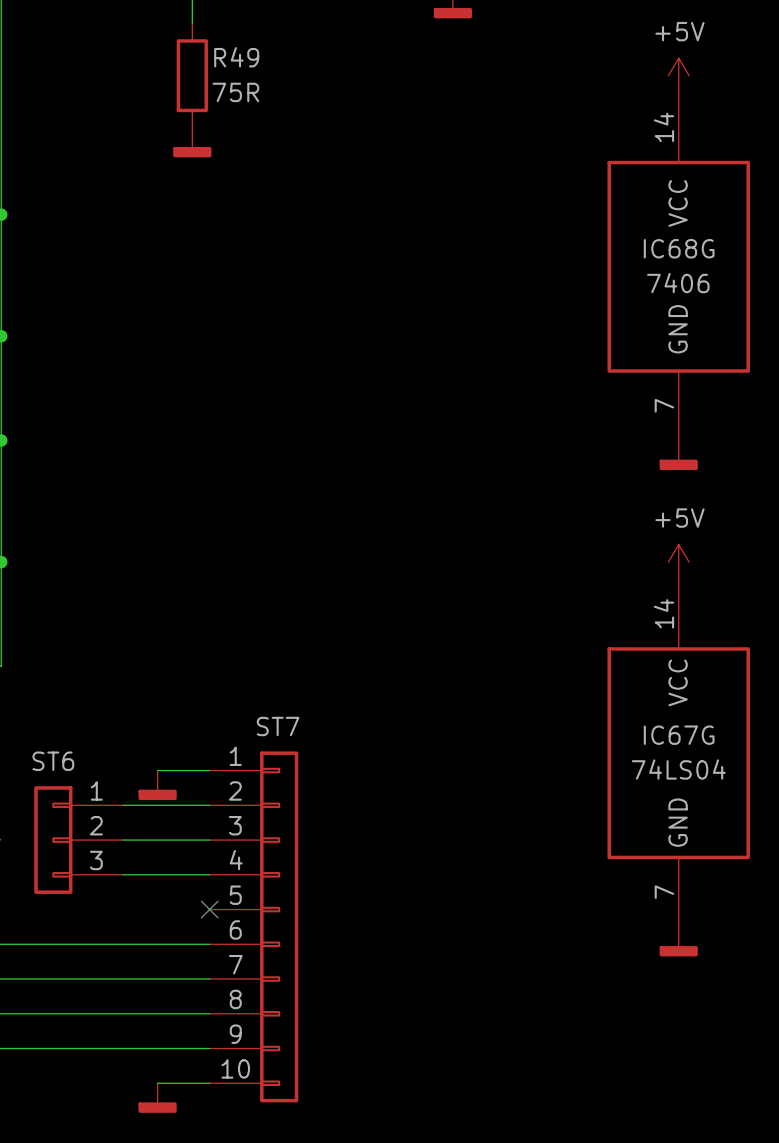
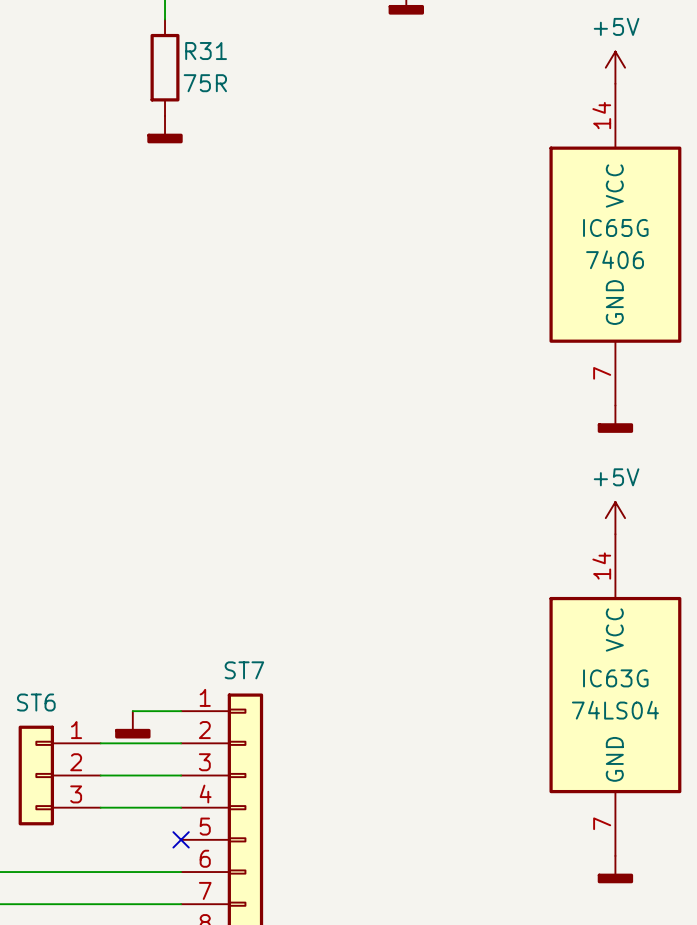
R49 name: R49 (236, 57) -> R31 (206, 51)
IC68G name: IC68G (679, 248) -> IC65G (615, 227)
IC67G name: IC67G (679, 735) -> IC63G (615, 678)

